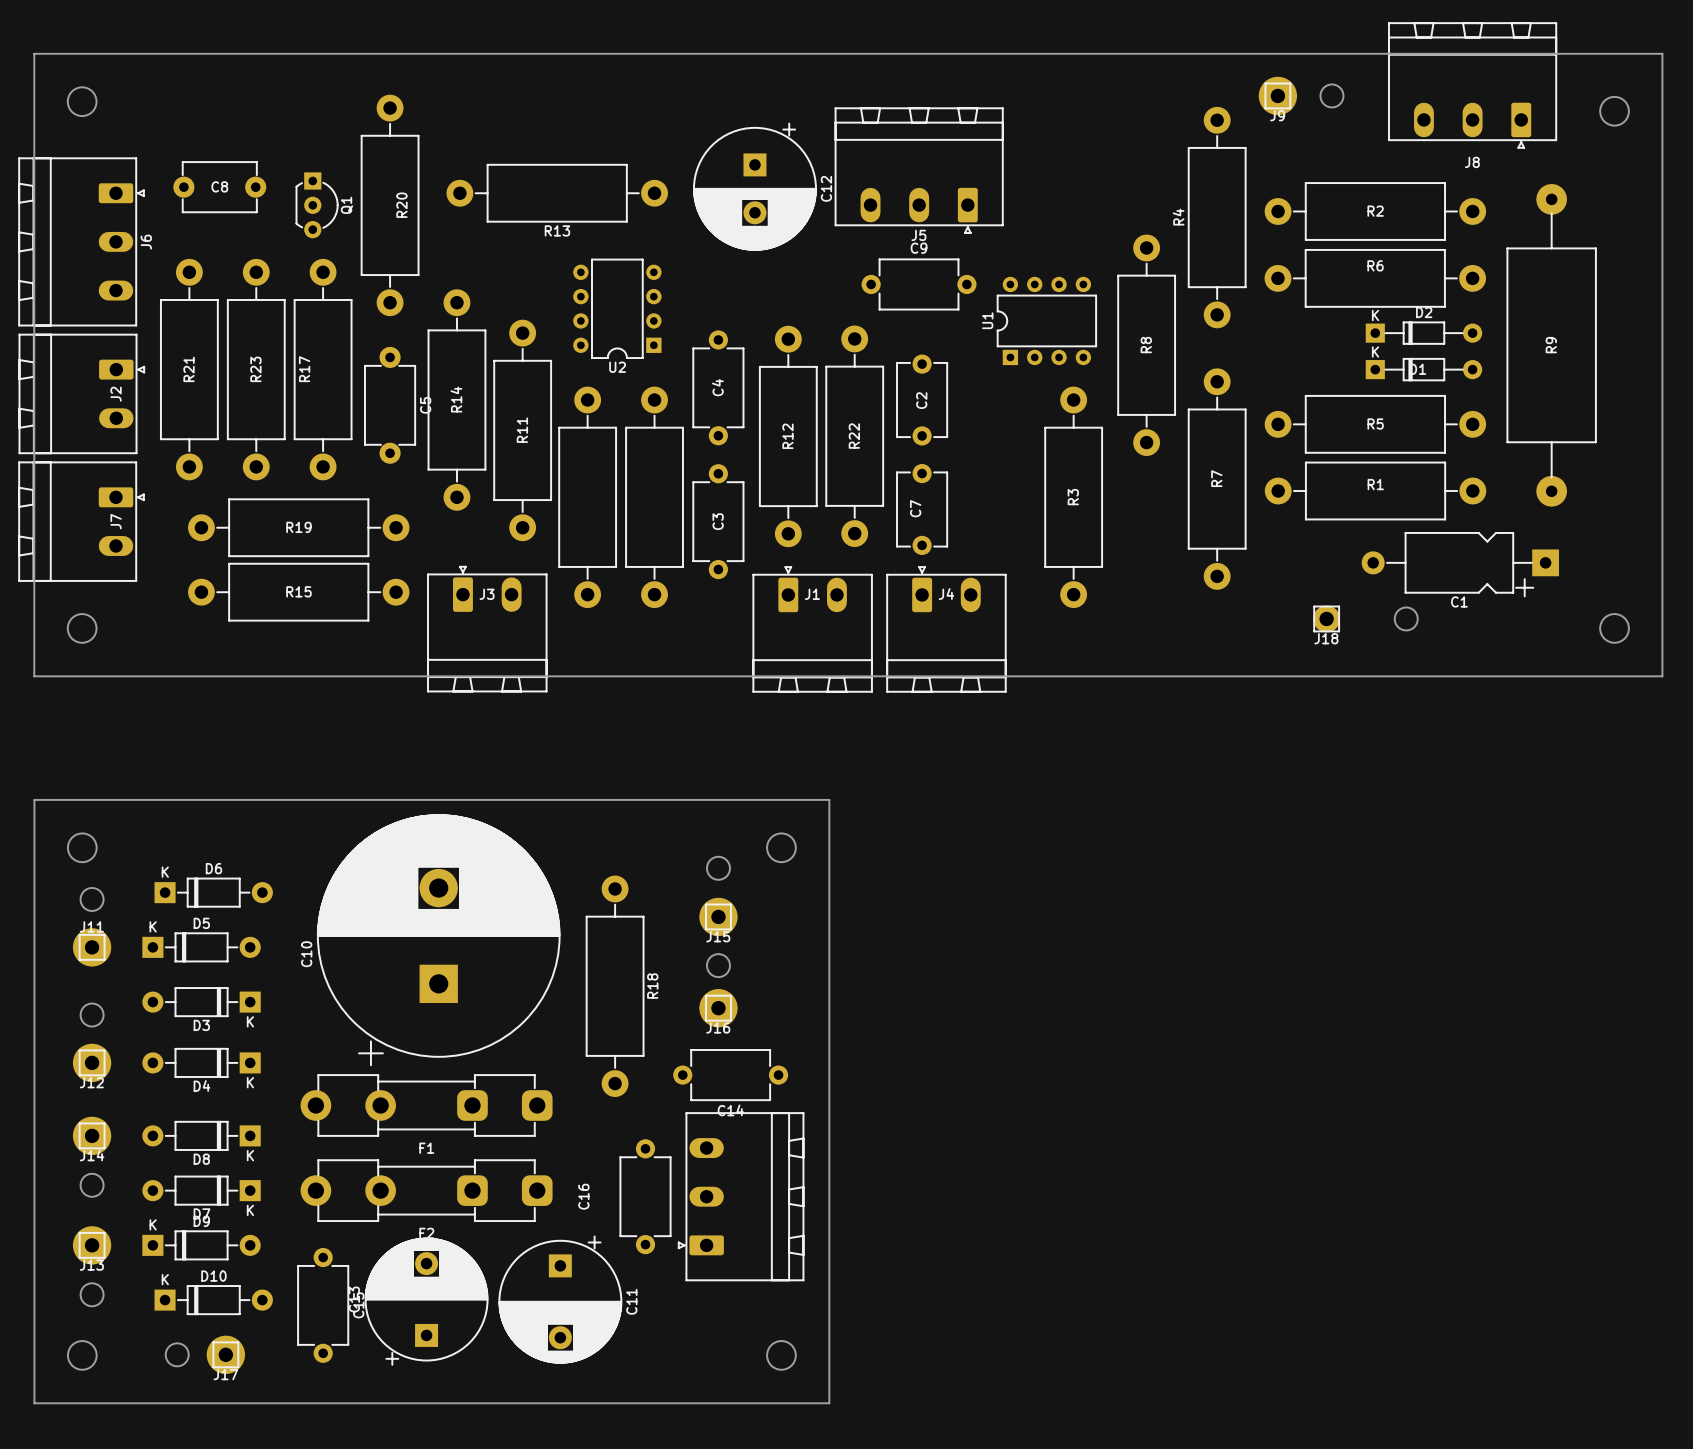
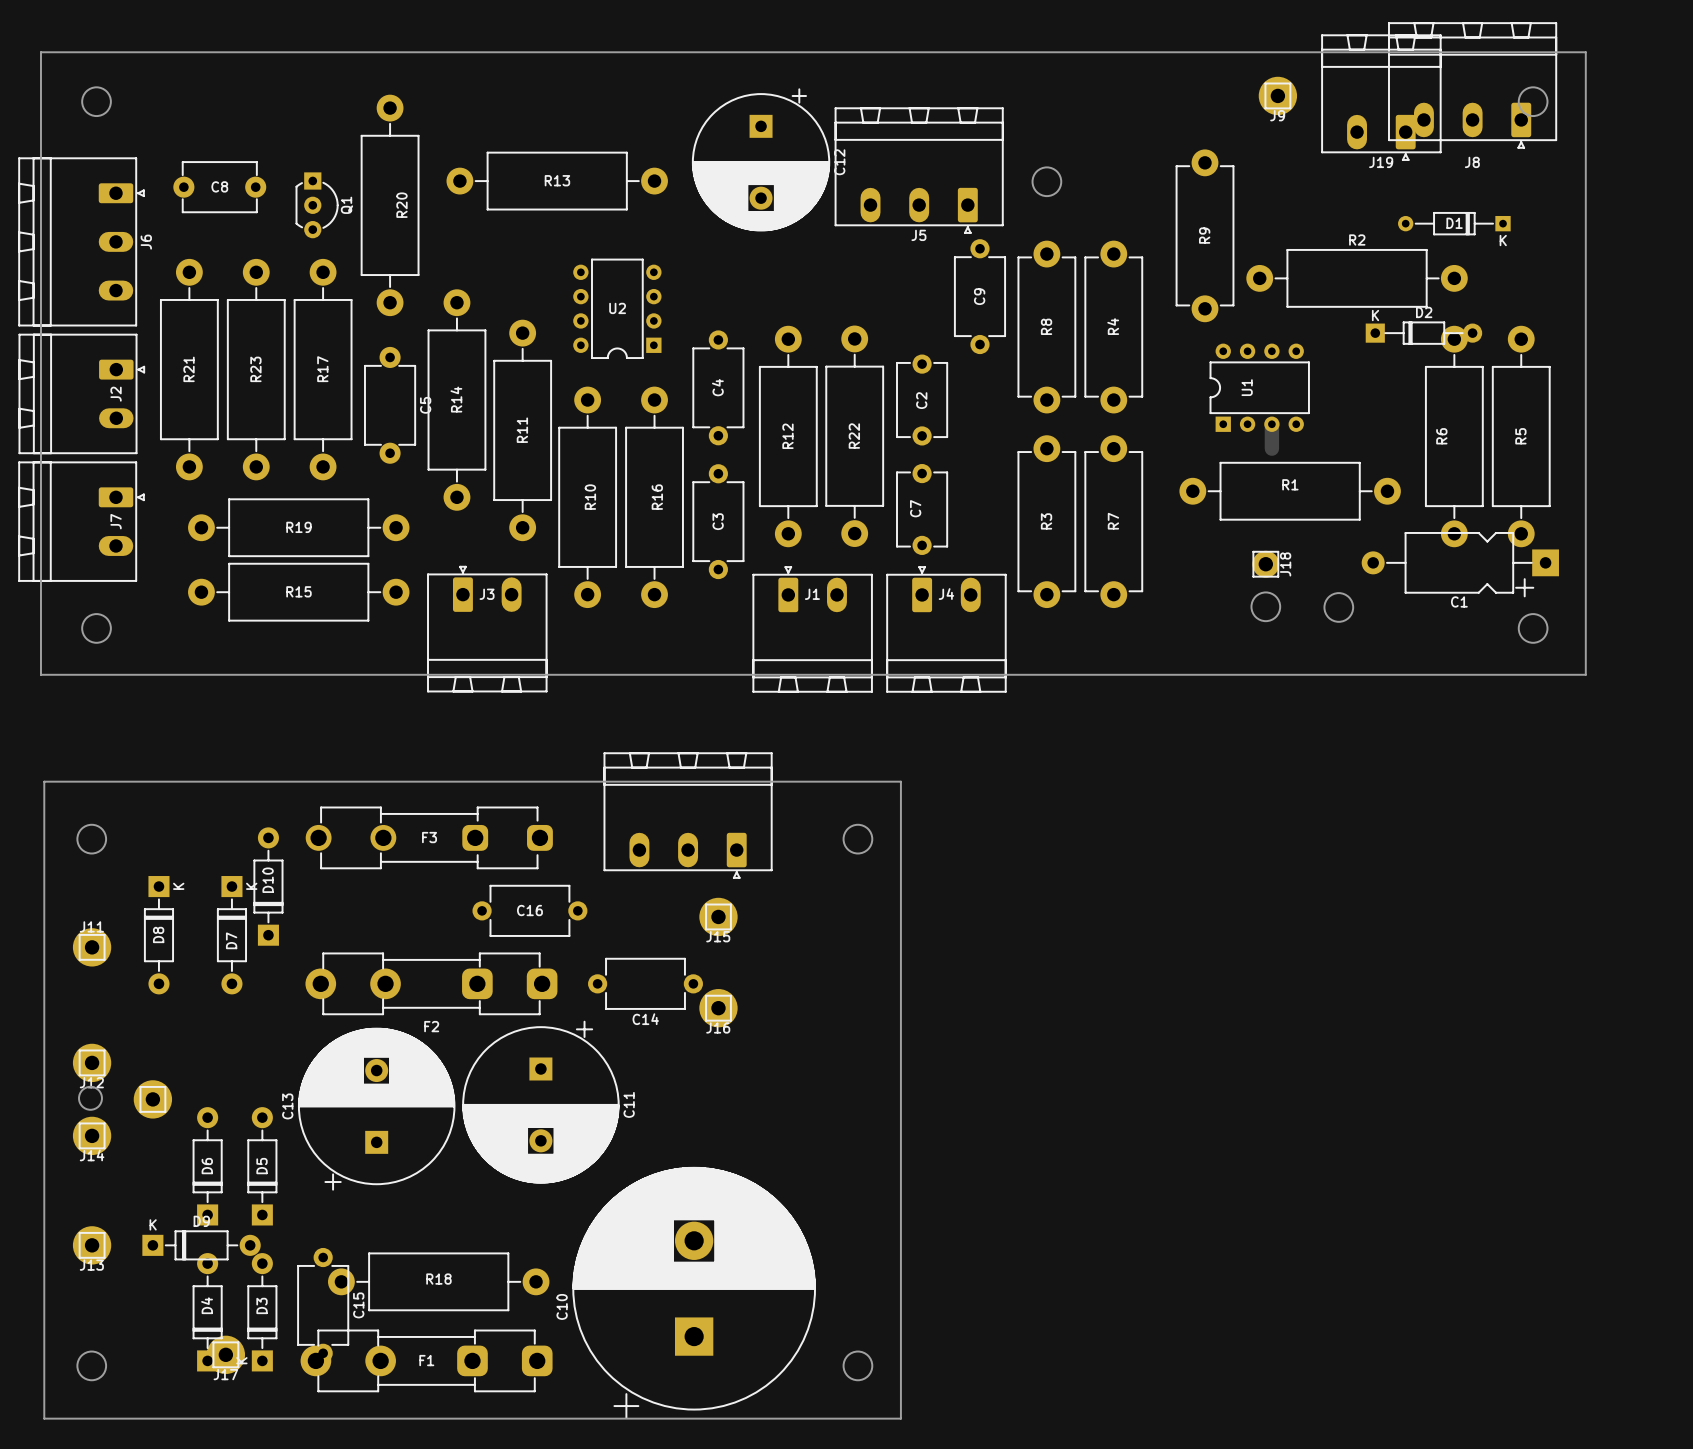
board edge: (34, 53) (1662, 53) (1662, 676) (34, 676) (34, 53) -> (40, 52) (40, 674) (1585, 674) (1585, 52) (40, 52)
round board edge: [1319, 83, 1344, 108] -> none
J19: none -> (1381, 97)
round board edge position: (82, 101) -> (96, 101)
R4 footprint: [1188, 106, 1247, 329] -> [1084, 240, 1143, 414]
round board edge position: (1614, 111) -> (1533, 101)
C12 footprint: [693, 122, 817, 251] -> [692, 88, 830, 232]
round board edge: none -> [1032, 166, 1062, 197]
R9 footprint: [1506, 184, 1597, 507] -> [1175, 149, 1235, 323]
R13 position: (557, 193) -> (557, 181)
R2 position: (1375, 211) -> (1357, 278)
R2 name position: R2 (1375, 211) -> R2 (1357, 240)
R4 name position: R4 (1178, 217) -> R4 (1113, 326)
R13 name position: R13 (557, 230) -> R13 (557, 180)
R8 footprint: [1117, 234, 1176, 457] -> [1017, 240, 1076, 414]
C9 name position: C9 (919, 248) -> C9 (979, 296)
R6 rotation: 0° (1375, 278) -> 90° clockwise (1454, 436)
R6 position: (1375, 278) -> (1454, 436)
C9 rotation: 0° (919, 284) -> 90° clockwise (979, 296)
U1 name position: U1 (987, 320) -> U1 (1247, 387)
U1 position: (1046, 320) -> (1259, 387)
D1 footprint: [1365, 358, 1483, 381] -> [1398, 212, 1511, 235]
U2 name position: U2 (617, 367) -> U2 (617, 308)
R7 footprint: [1188, 368, 1247, 590] -> [1084, 435, 1143, 609]
R17 name position: R17 (304, 369) -> R17 (322, 369)
R3 footprint: [1044, 386, 1103, 609] -> [1017, 435, 1076, 609]
track: none -> (1271, 424) (1271, 448)
R5 rotation: 0° (1375, 424) -> 90° clockwise (1521, 436)
R5 position: (1375, 424) -> (1521, 436)
R1 position: (1375, 491) -> (1290, 491)
R10 name: none -> R10 (590, 497)
R16 name: none -> R16 (657, 497)
round board edge: none -> [1250, 591, 1281, 622]
round board edge: none -> [1323, 592, 1354, 623]
round board edge: [1394, 606, 1419, 631] -> none
J18 position: (1326, 618) -> (1265, 564)
round board edge position: (82, 628) -> (96, 628)
round board edge position: (1614, 628) -> (1533, 628)
J18 name rotation: 0° (1326, 638) -> 90° counterclockwise (1285, 564)
board edge: (34, 799) (829, 799) (829, 1403) (34, 1403) (34, 799) -> (44, 781) (44, 1418) (900, 1418) (900, 781) (44, 781)
part: none -> (688, 815)
F3: none -> (429, 837)
round board edge position: (82, 847) -> (91, 839)
round board edge position: (781, 847) -> (857, 839)
round board edge: [706, 856, 731, 881] -> none
D6 name position: D6 (213, 868) -> D6 (207, 1166)
D6 footprint: [154, 877, 273, 908] -> [192, 1107, 223, 1226]
round board edge: [80, 887, 105, 912] -> none
D5 name position: D5 (201, 923) -> D5 (262, 1166)
D5 footprint: [142, 932, 261, 963] -> [247, 1107, 278, 1226]
C10 position: (438, 940) -> (694, 1292)
round board edge: [706, 953, 731, 978] -> none
R18 rotation: 0° (615, 986) -> 90° clockwise (438, 1281)
R18 position: (615, 986) -> (438, 1281)
R18 name position: R18 (652, 986) -> R18 (438, 1279)
D3 rotation: 0° (201, 1002) -> 90° clockwise (262, 1312)
D3 position: (201, 1002) -> (262, 1312)
round board edge: [80, 1003, 105, 1028] -> none
D3 name position: D3 (201, 1025) -> D3 (262, 1305)
D4 footprint: [142, 1048, 261, 1078] -> [192, 1253, 223, 1372]
C14 position: (730, 1075) -> (645, 983)
D4 name position: D4 (202, 1085) -> D4 (207, 1305)
round board edge: none -> [78, 1086, 103, 1111]
part: none -> (152, 1099)
F1 position: (426, 1105) -> (426, 1360)
D8 rotation: 0° (201, 1135) -> 90° counterclockwise (158, 935)
D8 position: (201, 1135) -> (158, 935)
F1 name position: F1 (426, 1148) -> F1 (426, 1360)
D8 name position: D8 (201, 1159) -> D8 (158, 934)
round board edge: [80, 1173, 105, 1198] -> none
D7 rotation: 0° (201, 1190) -> 90° counterclockwise (231, 935)
D7 position: (201, 1190) -> (231, 935)
F2 position: (426, 1190) -> (431, 983)
C16 name position: C16 (583, 1196) -> C16 (529, 910)
C16 rotation: 0° (645, 1196) -> 90° clockwise (529, 910)
C16 position: (645, 1196) -> (529, 910)
part: (741, 1196) -> none
C11 footprint: [498, 1235, 622, 1364] -> [462, 1021, 620, 1184]
C13 footprint: [364, 1237, 489, 1366] -> [298, 1028, 456, 1191]
round board edge: [80, 1282, 105, 1307] -> none
D10 footprint: [154, 1285, 273, 1315] -> [253, 827, 284, 946]
round board edge: [165, 1342, 190, 1367] -> none
round board edge position: (82, 1355) -> (91, 1365)
round board edge position: (781, 1355) -> (857, 1365)

